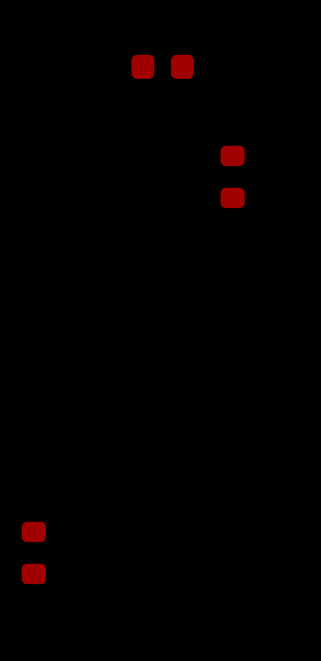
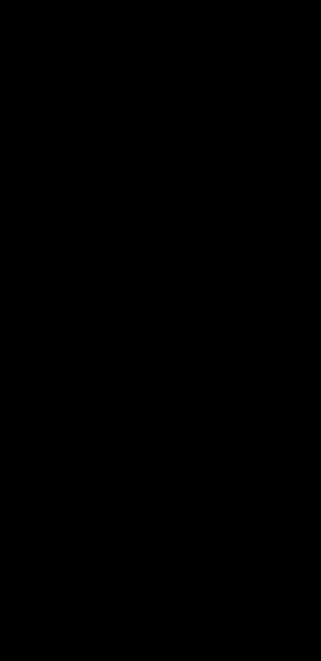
part: (162, 66) -> none
part: (232, 176) -> none
part: (33, 552) -> none

